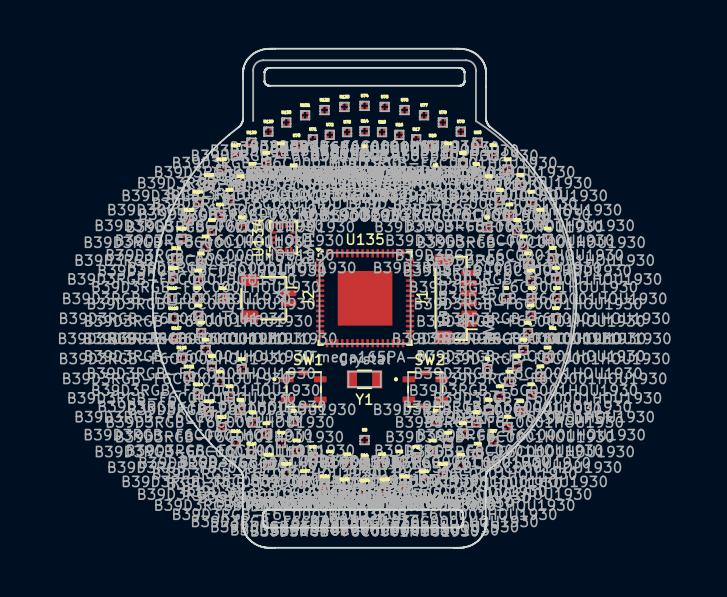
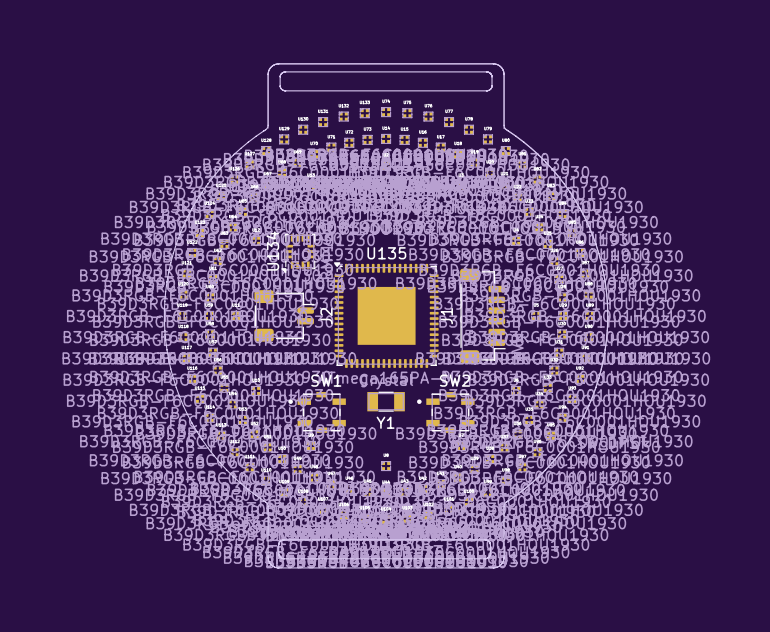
board edge: none -> (278, 63) (498, 65) (504, 73) (504, 127) (531, 148) (552, 169) (575, 200) (588, 226) (601, 262) (607, 301) (606, 340) (601, 369) (584, 414) (564, 447) (538, 476) (504, 503) (504, 558) (497, 566) (273, 566) (268, 558) (267, 503) (240, 483) (219, 462) (196, 431) (183, 405) (170, 368) (164, 330) (165, 291) (173, 253) (187, 217) (207, 184) (233, 154) (267, 127) (268, 73) (271, 66) (278, 63)
board edge: (243, 77) (243, 67) (248, 58) (257, 51) (266, 48) (462, 48) (475, 53) (483, 62) (485, 71) (486, 122) (525, 160) (552, 199) (569, 244) (574, 268) (576, 294) (572, 339) (562, 374) (546, 406) (533, 426) (517, 444) (487, 472) (485, 518) -> none
board edge: (243, 78) (241, 123) (211, 151) (195, 169) (182, 189) (166, 221) (156, 256) (152, 300) (154, 327) (159, 351) (176, 395) (203, 435) (242, 473) (242, 524) (245, 534) (253, 543) (266, 547) (461, 547) (471, 545) (480, 538) (485, 529) (485, 518) -> none

